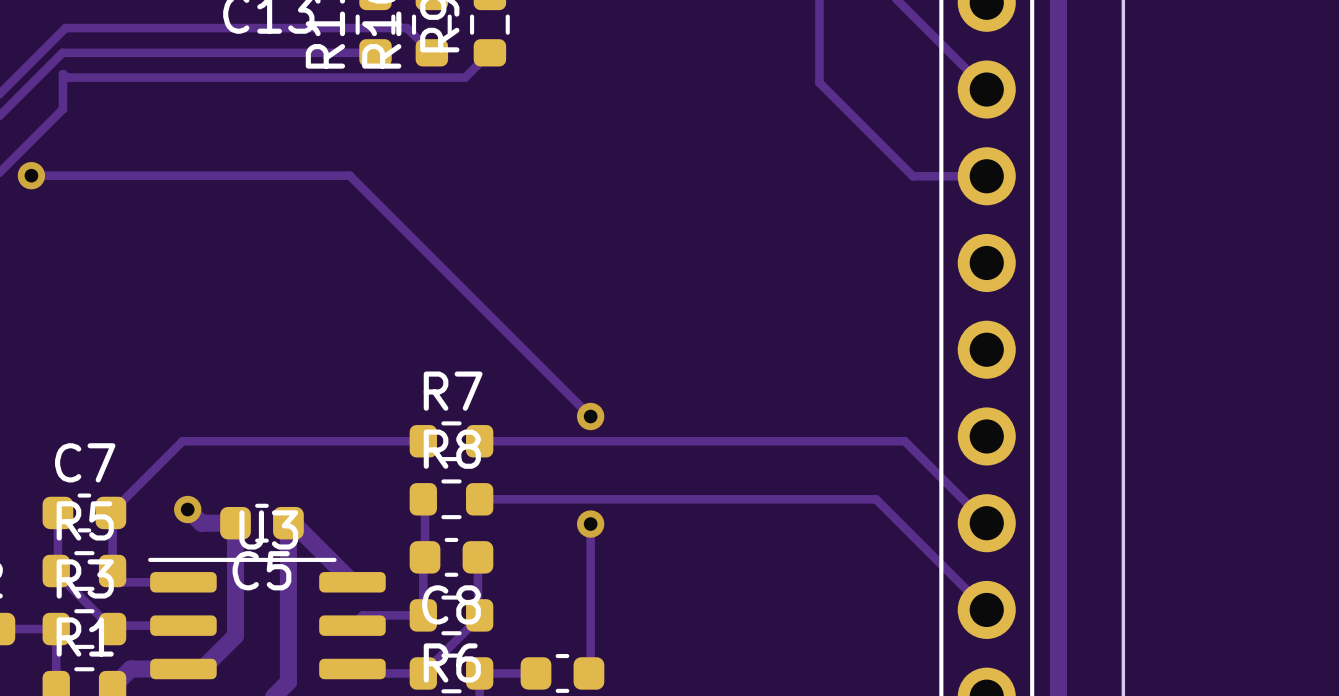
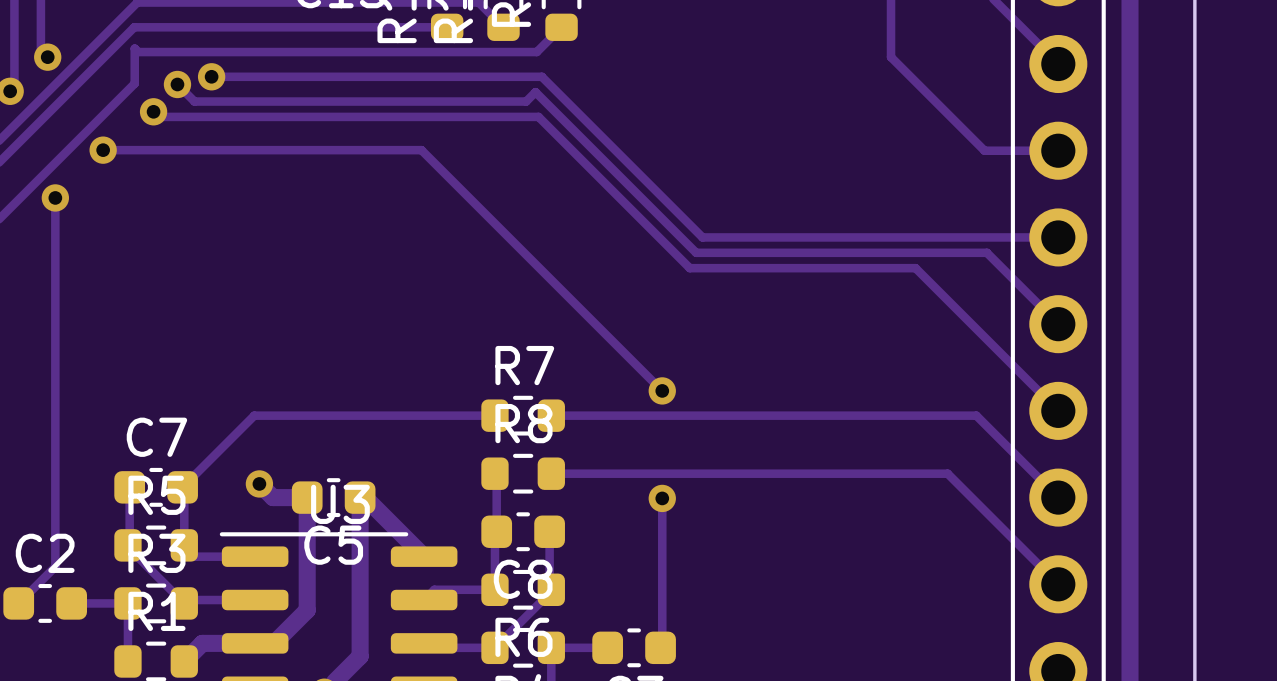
track: none -> (211, 76) (541, 76) (702, 237) (1058, 237)
via: none -> (211, 76)
track: none -> (177, 84) (194, 101) (526, 101) (535, 92) (696, 252) (986, 252) (1058, 324)
via: none -> (177, 84)
track: none -> (153, 111) (158, 116) (538, 116) (689, 268) (915, 268) (1058, 410)
via: none -> (153, 111)

